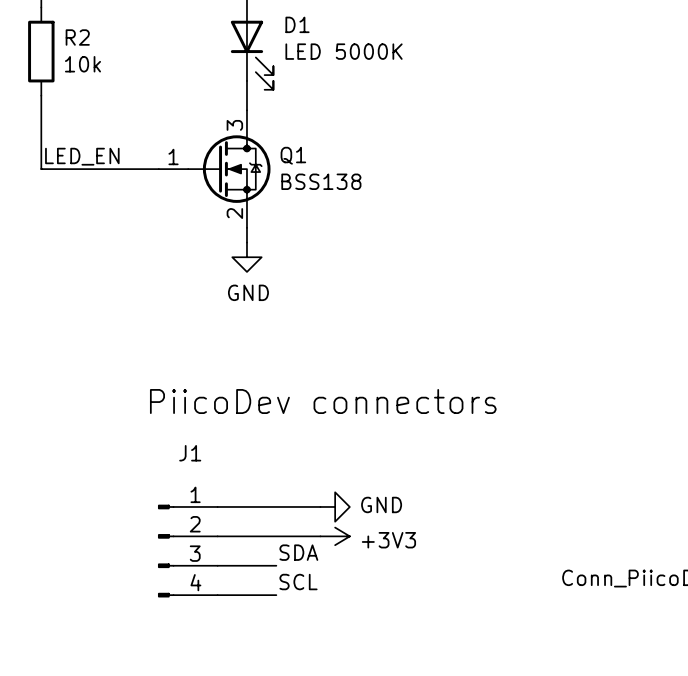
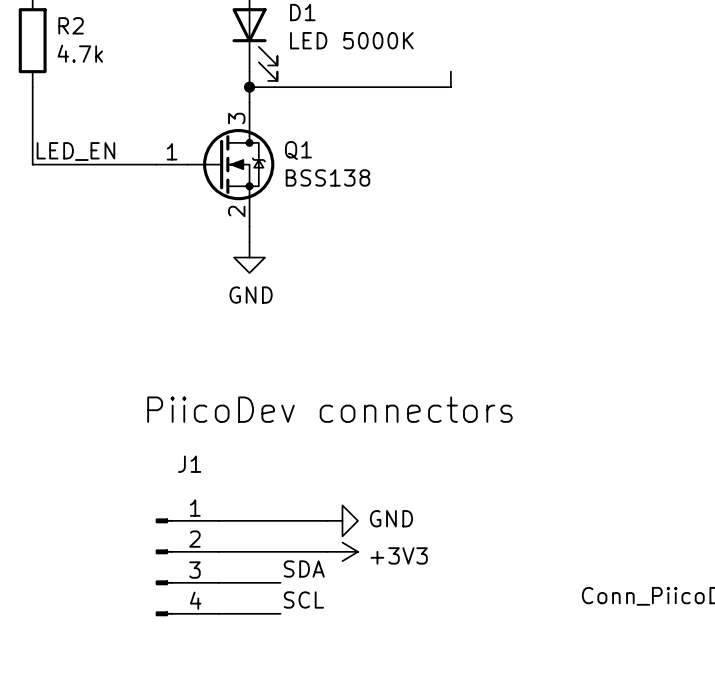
R2 value: 10k (82, 64) -> 4.7k (80, 53)
wire: none -> (450, 71) (450, 87) (249, 87)
junction: none -> (249, 87)

